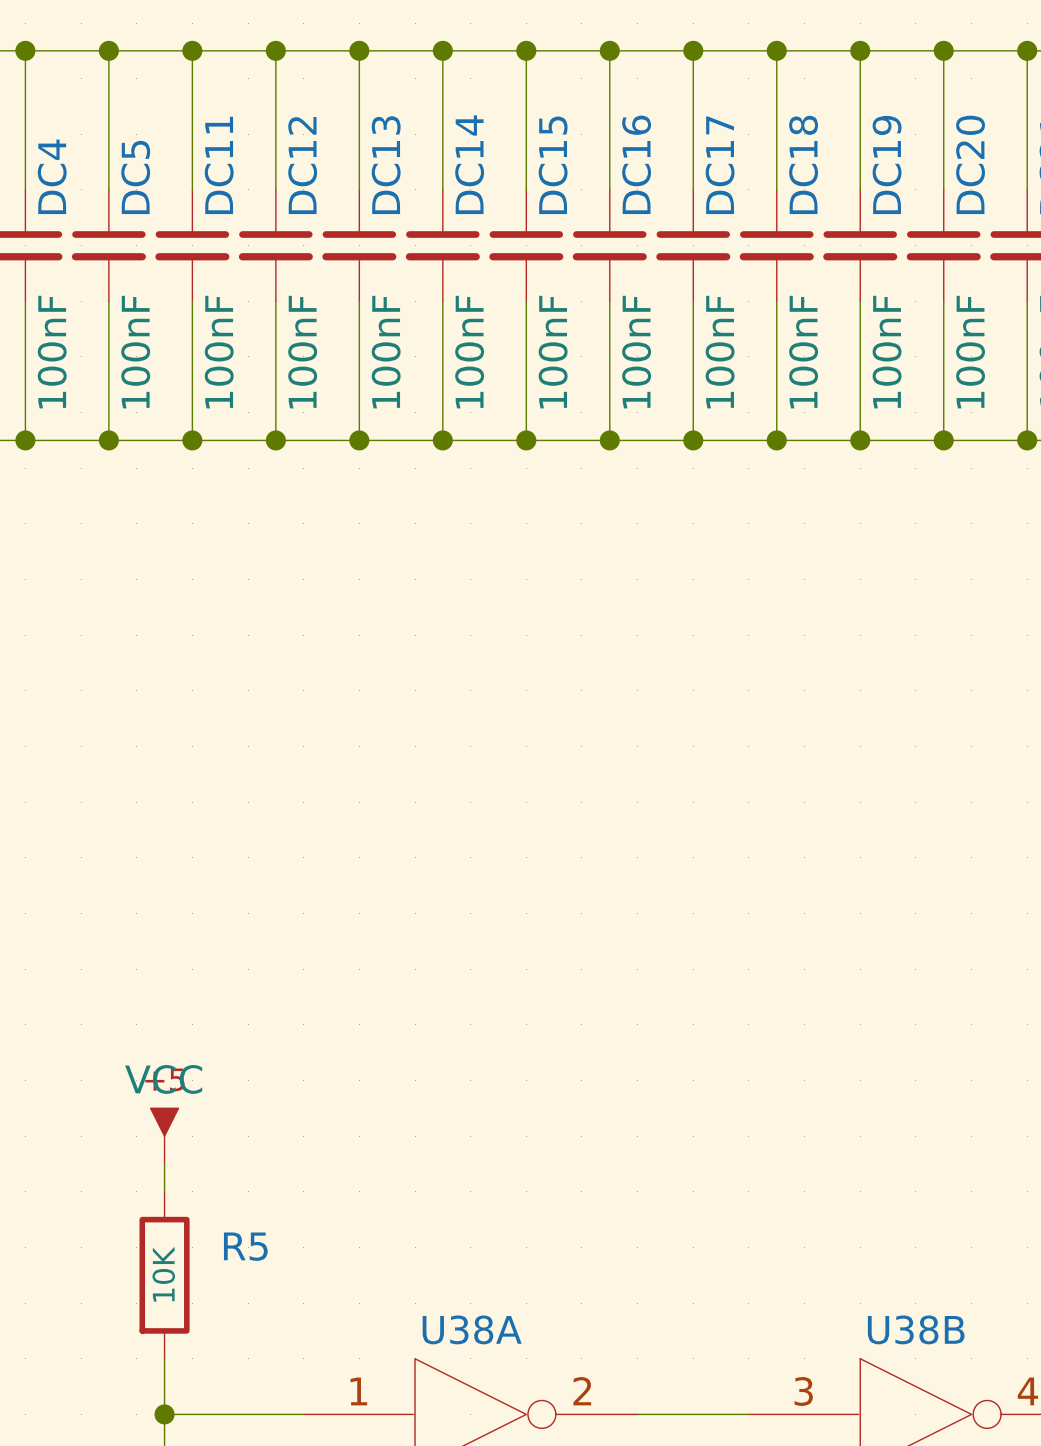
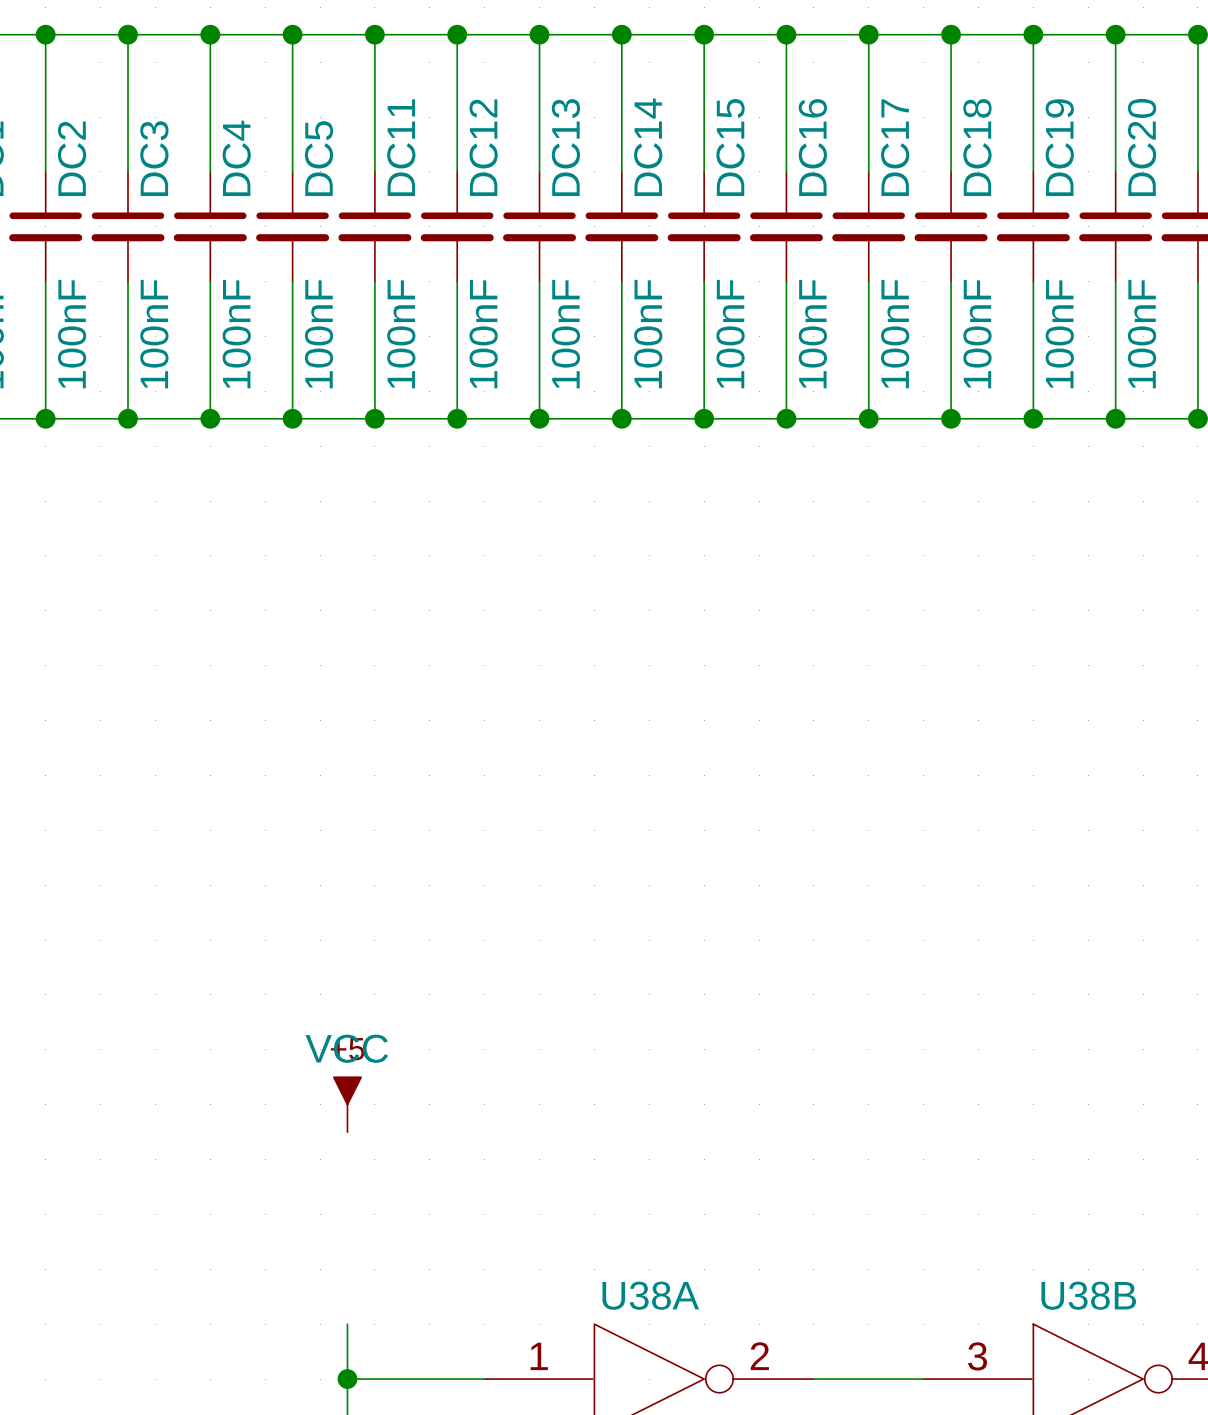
wire: (164, 1163) (164, 1191) -> none
R5: 10K (164, 1275) -> none

